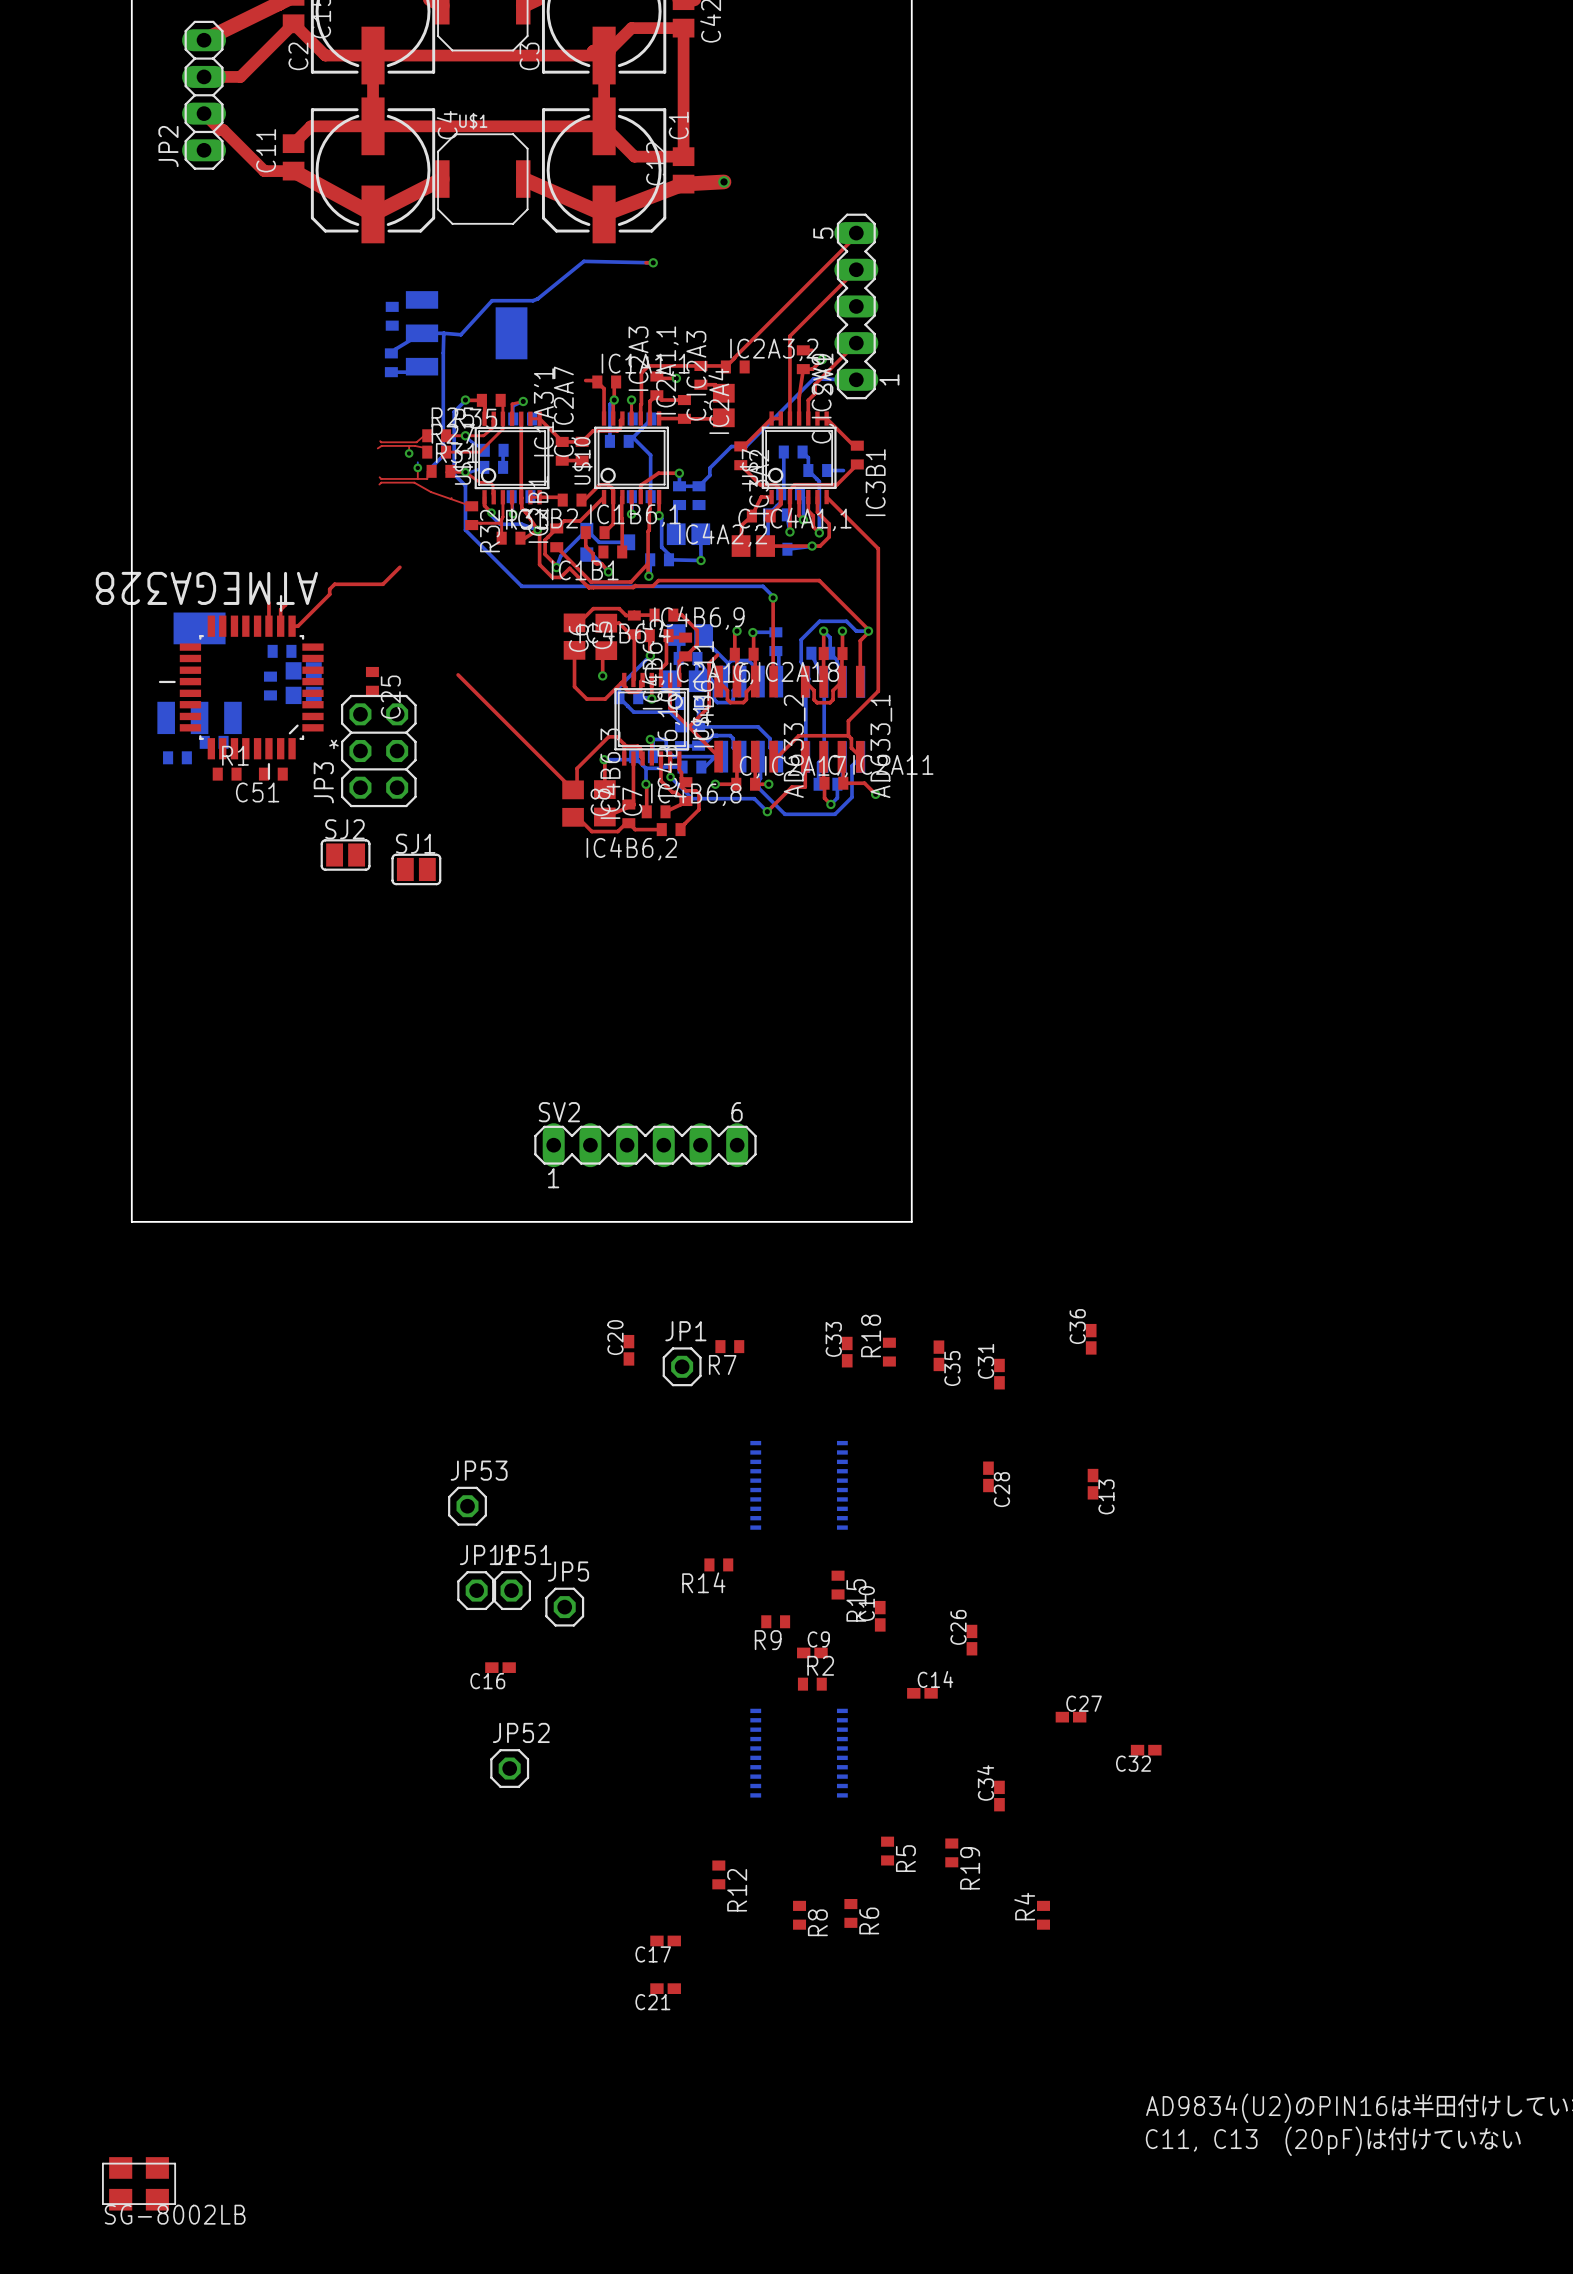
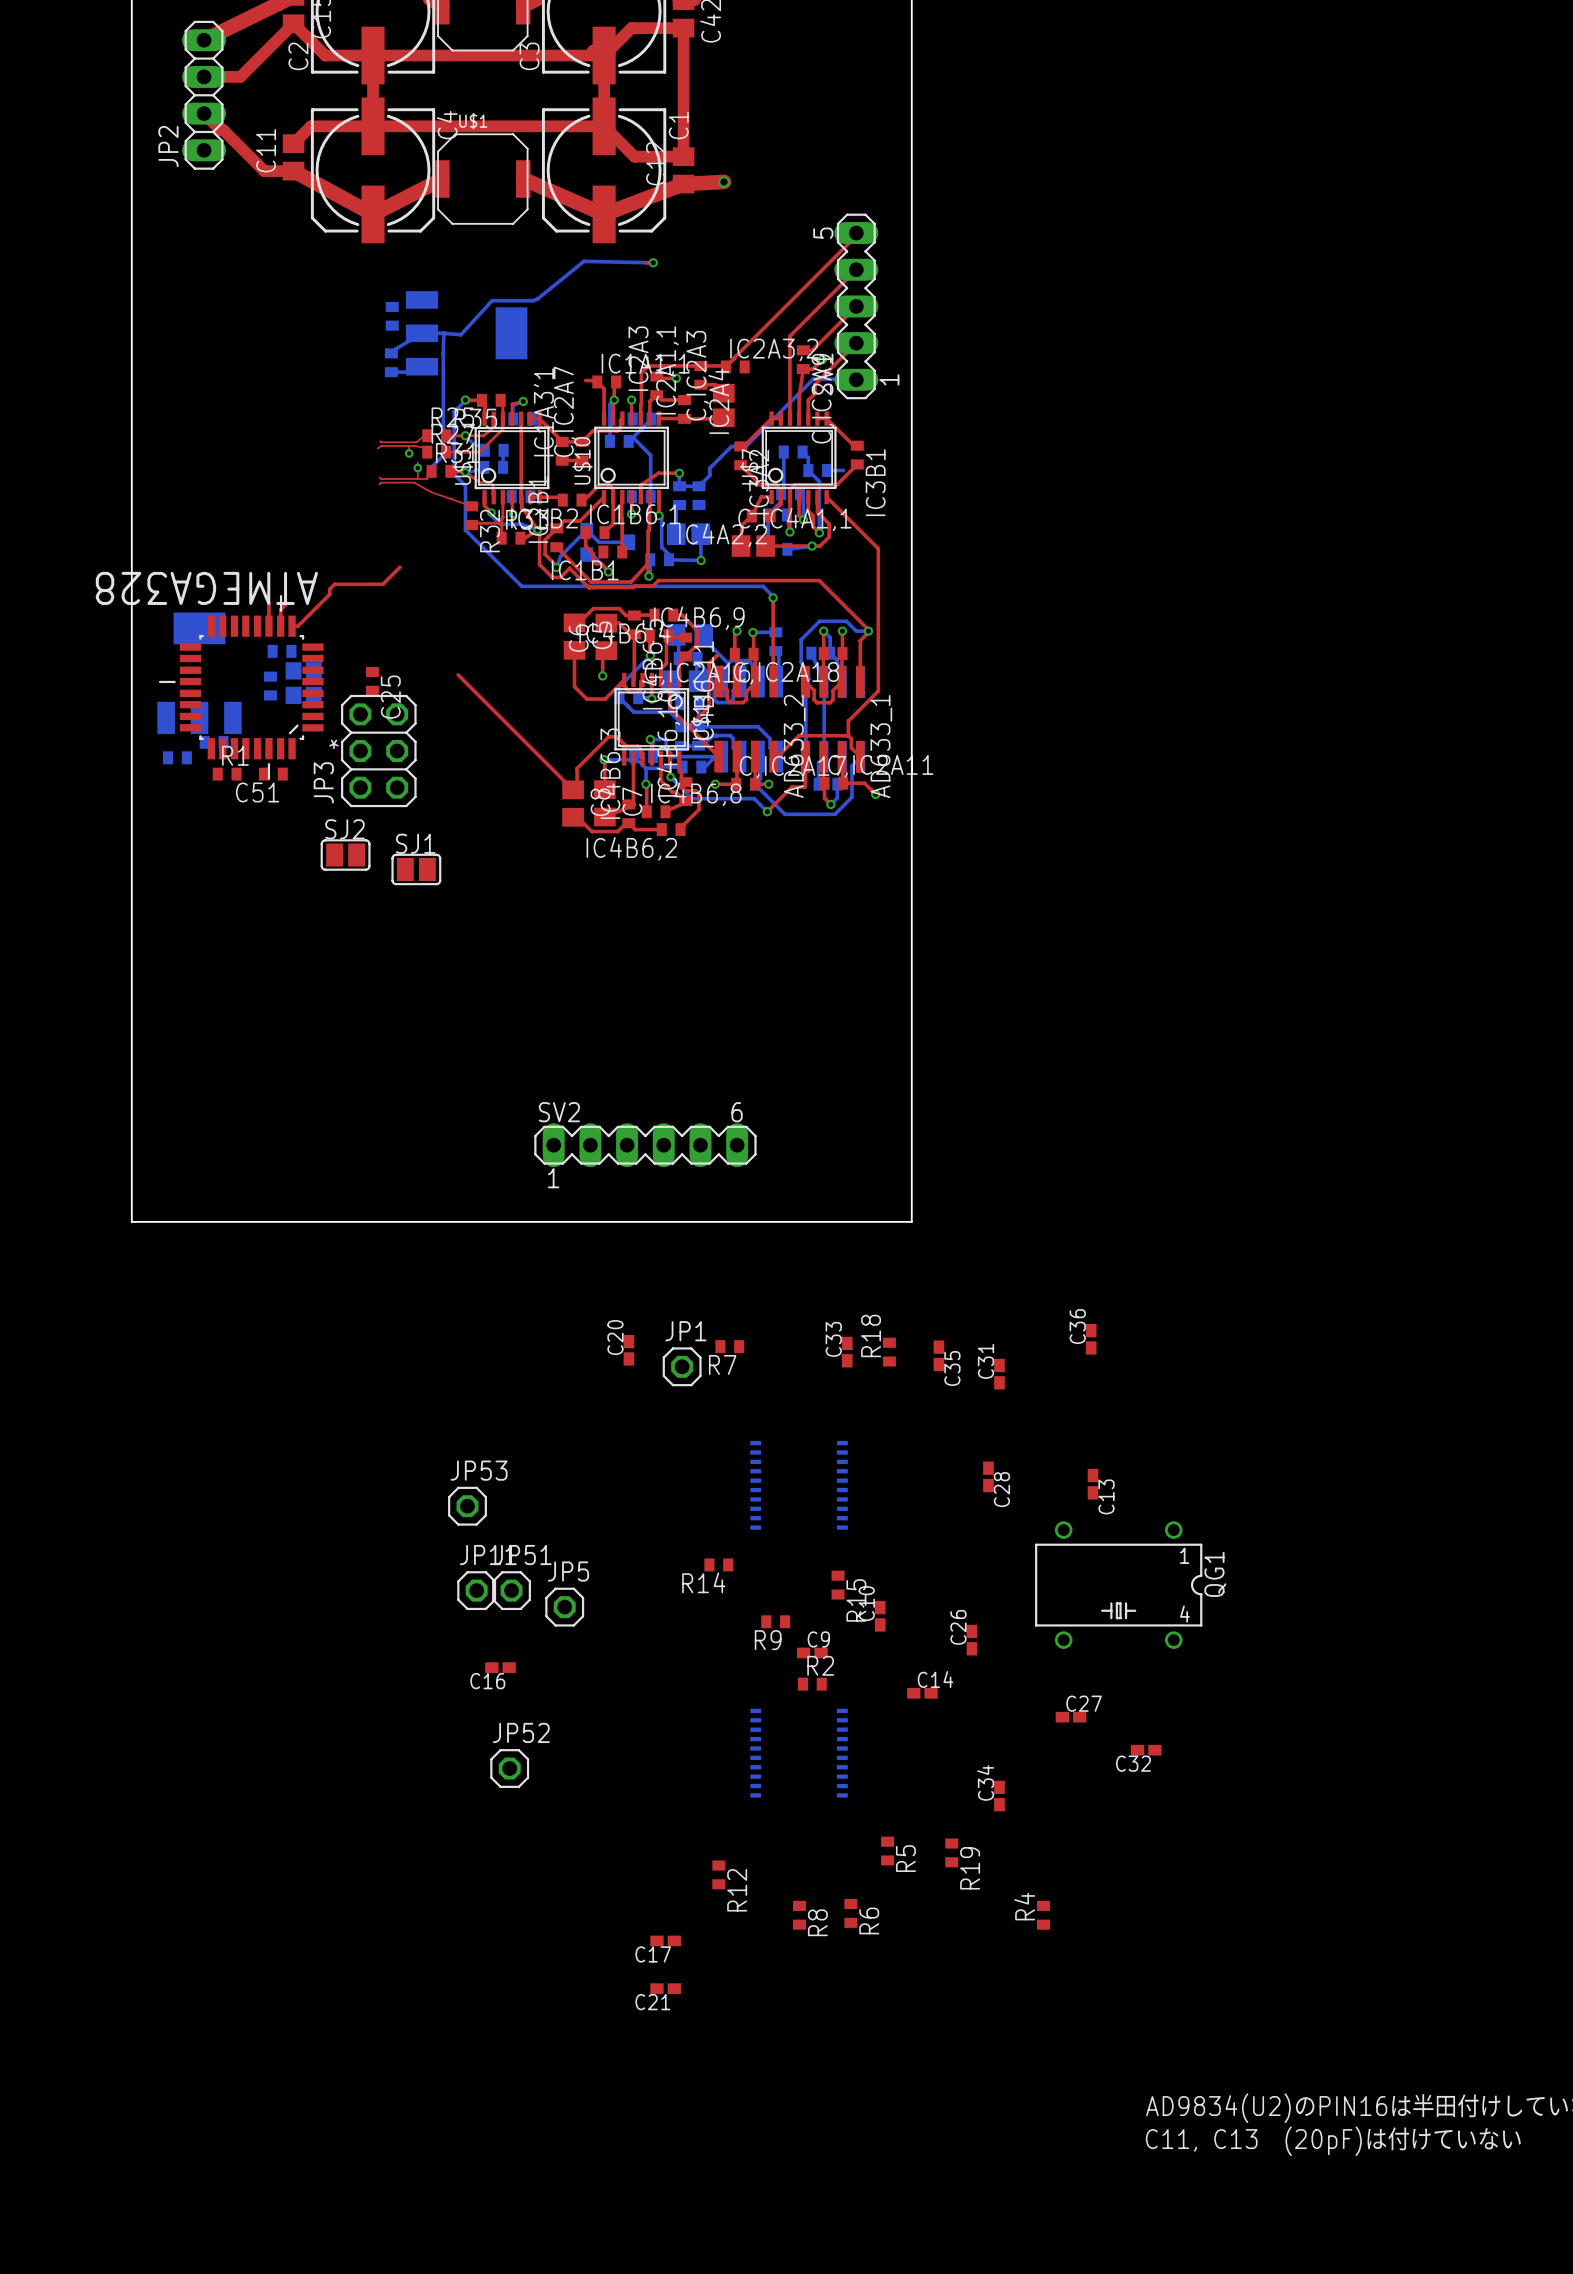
top track: none -> (856, 306) (812, 350)
QG1: none -> (1118, 1585)
part: (139, 2183) -> none

